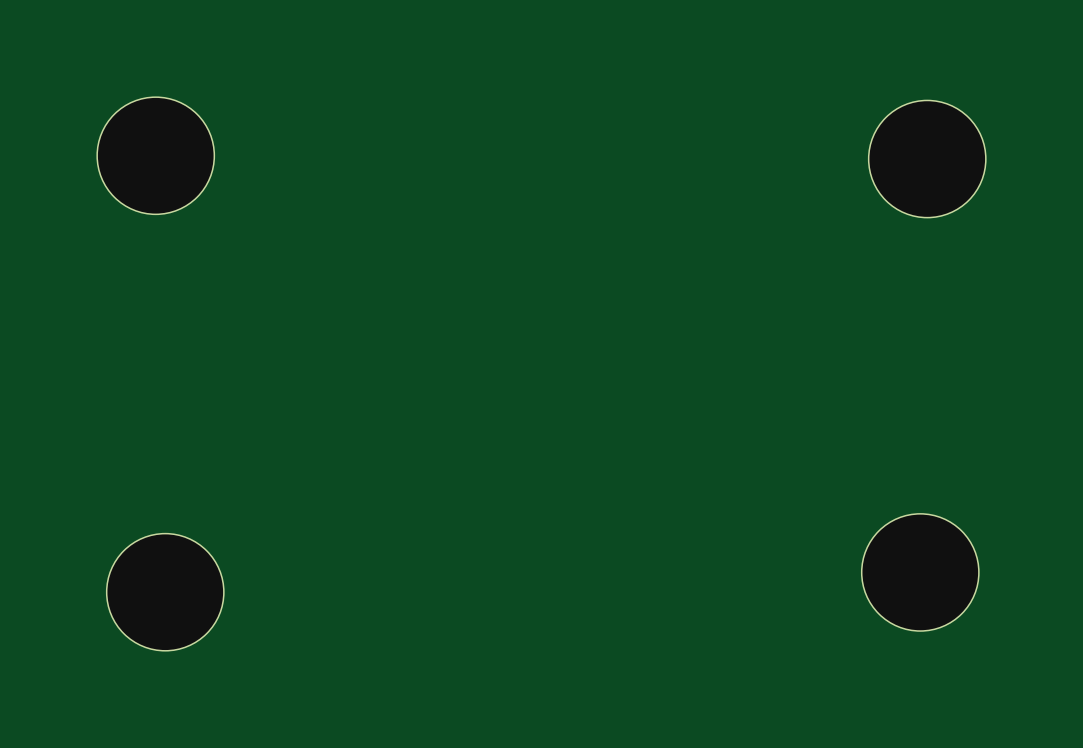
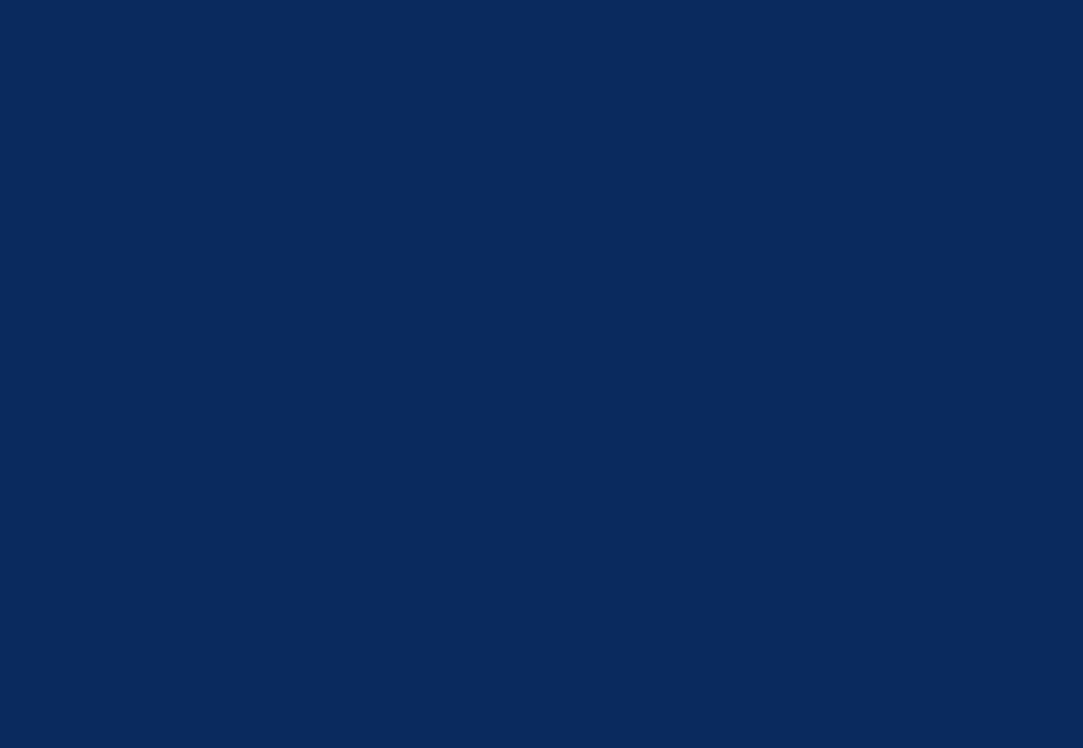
part: (155, 155) -> none
part: (927, 159) -> none
part: (920, 572) -> none
part: (165, 592) -> none

